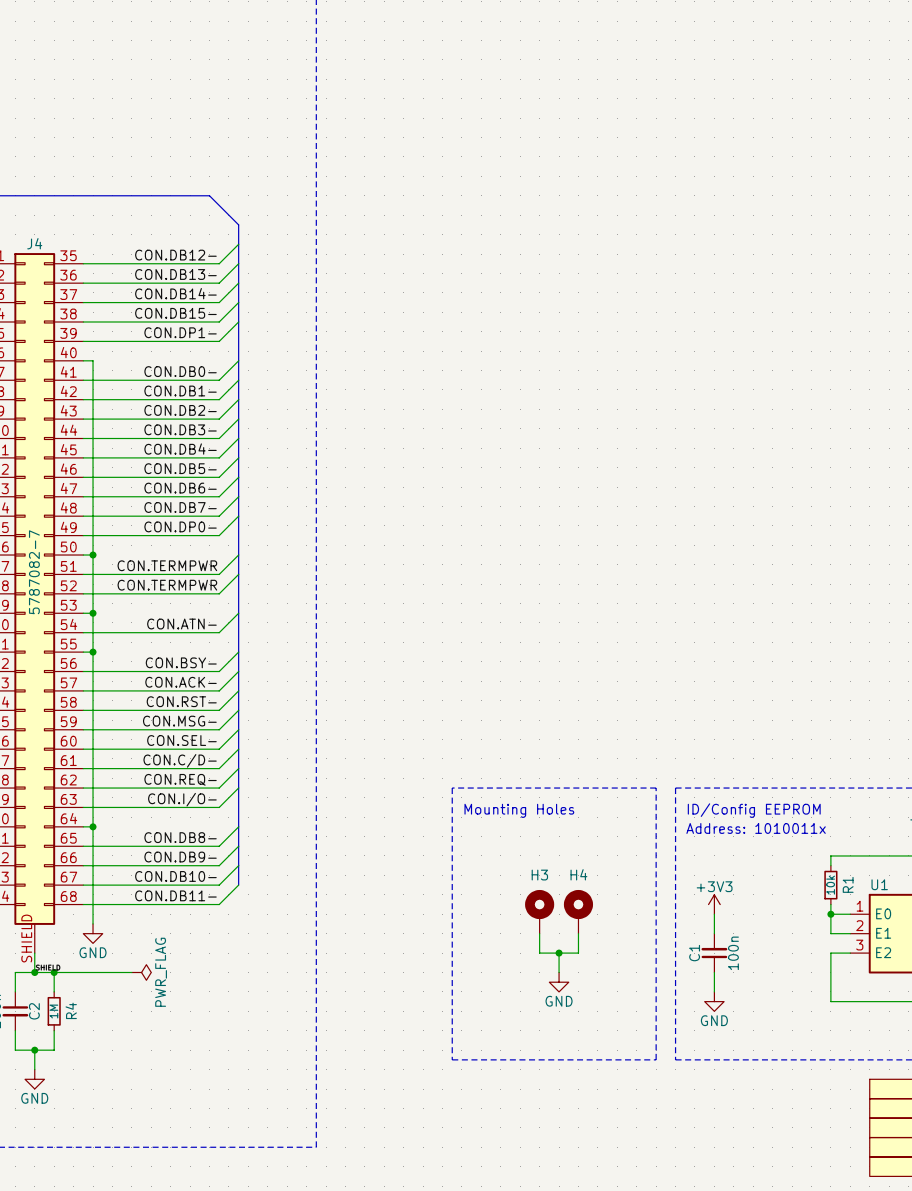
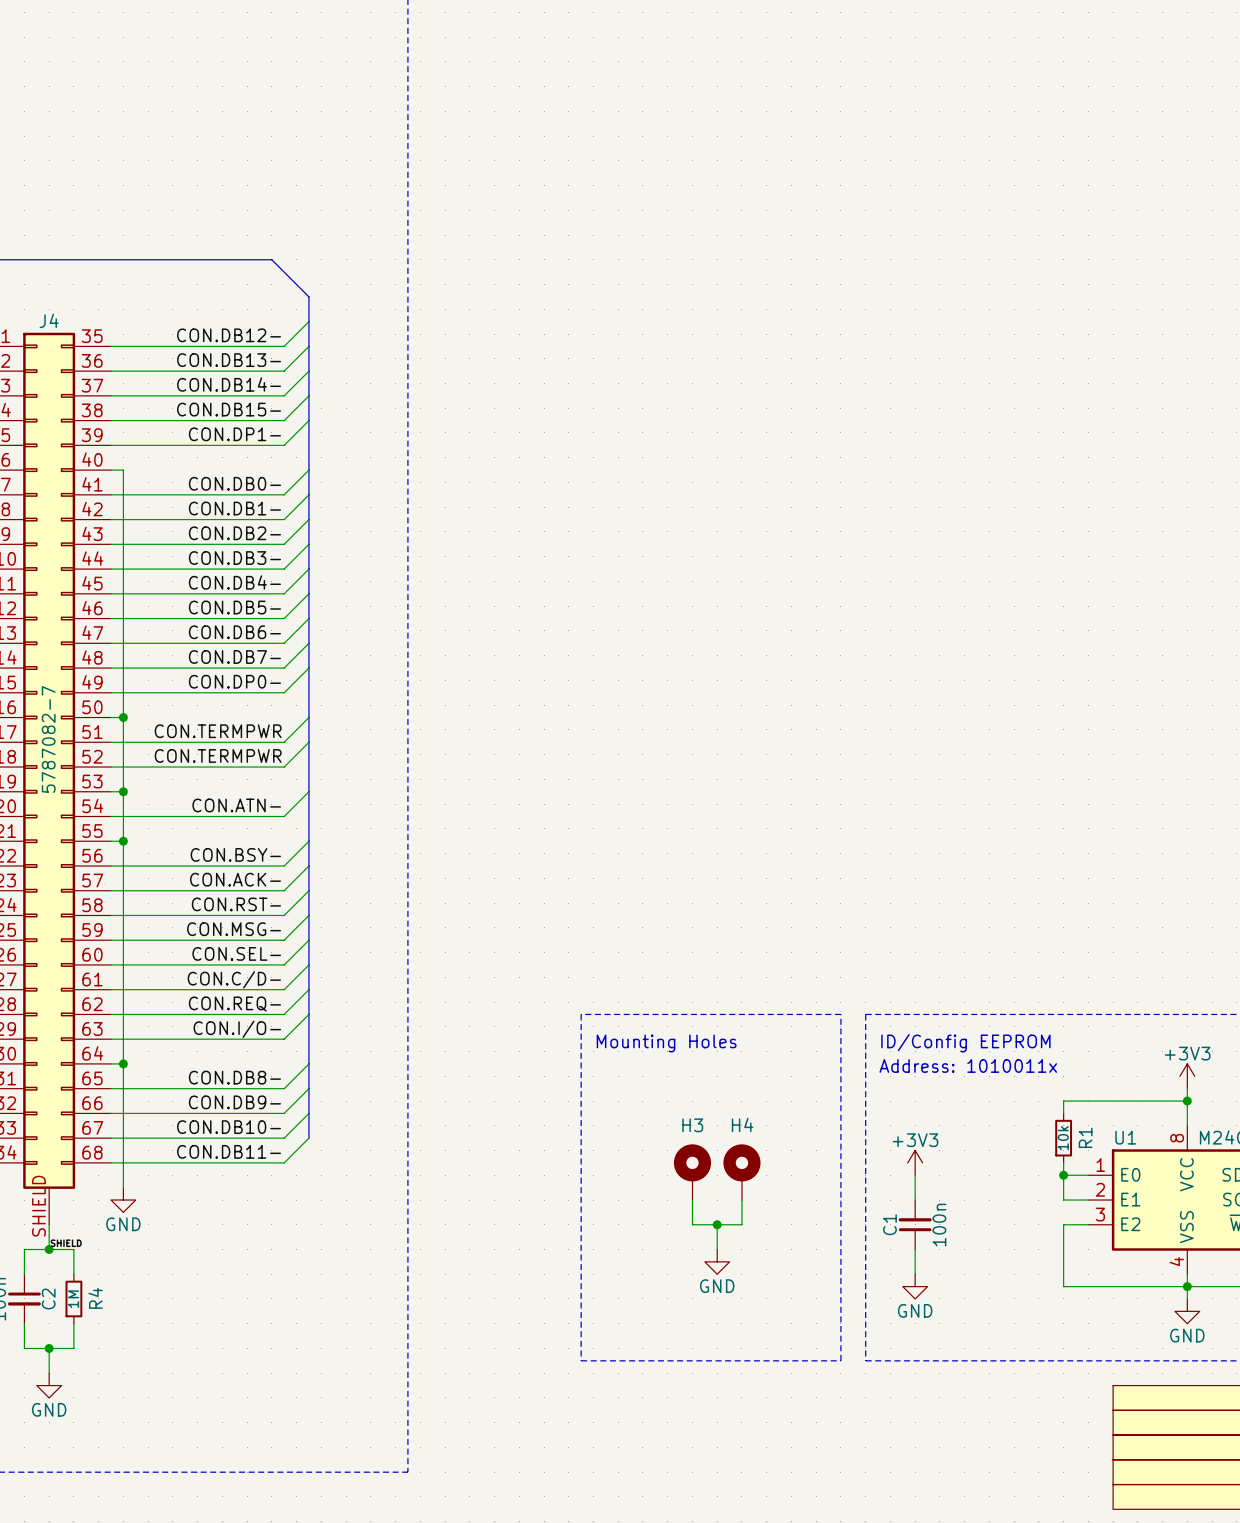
wire: (54, 972) (131, 972) -> none
junction: (54, 972) -> none
power symbol: PWR_FLAG (141, 972) -> none

